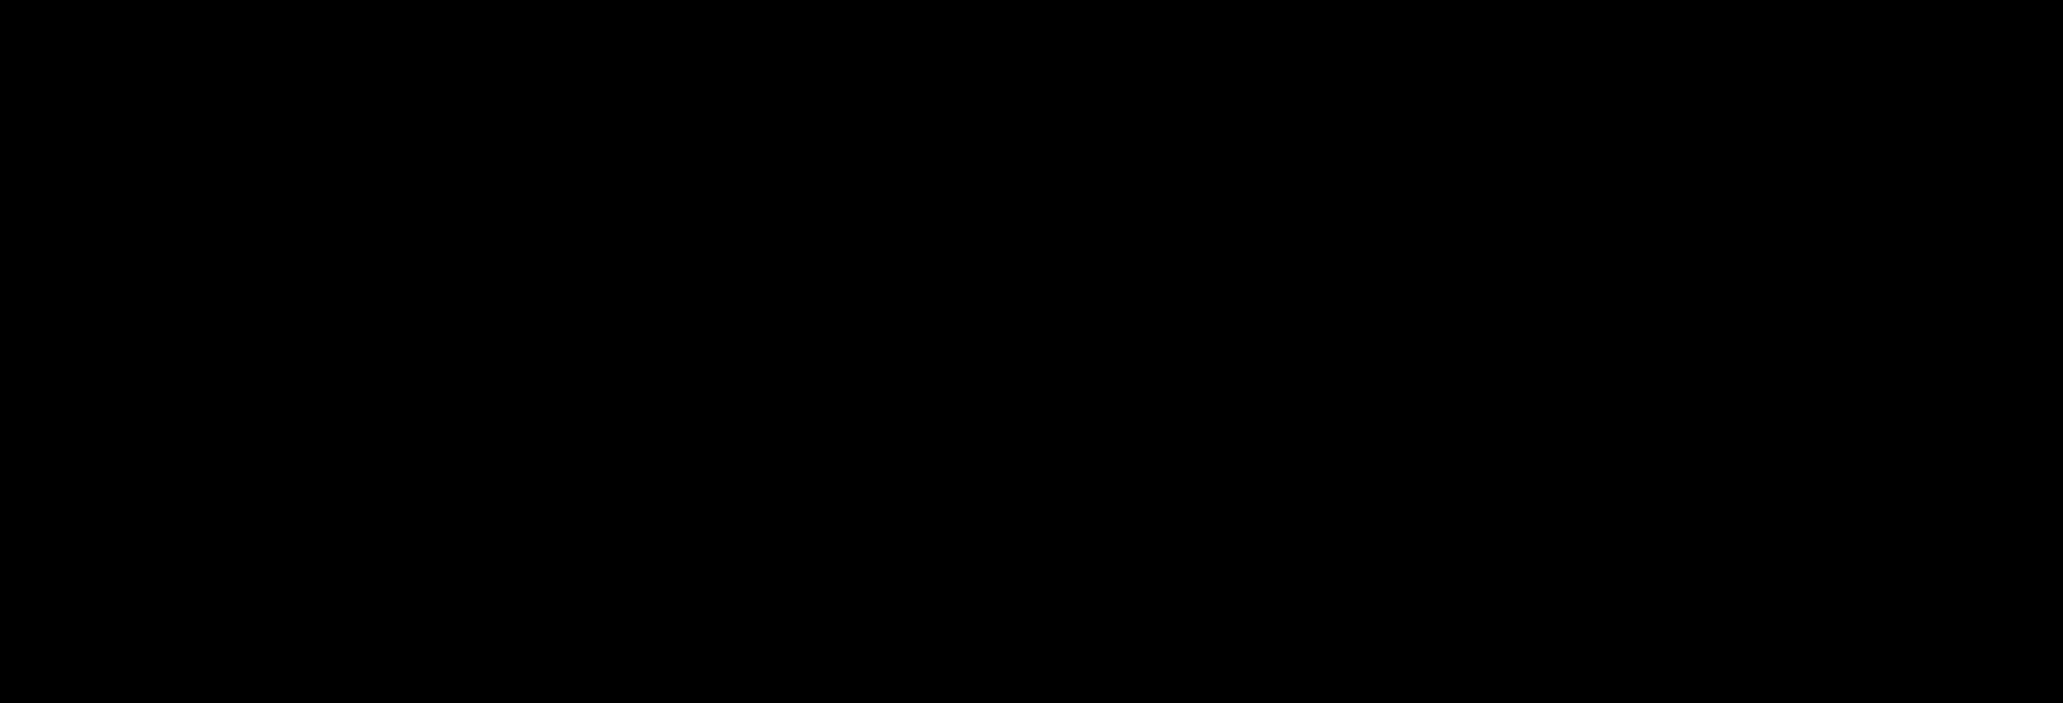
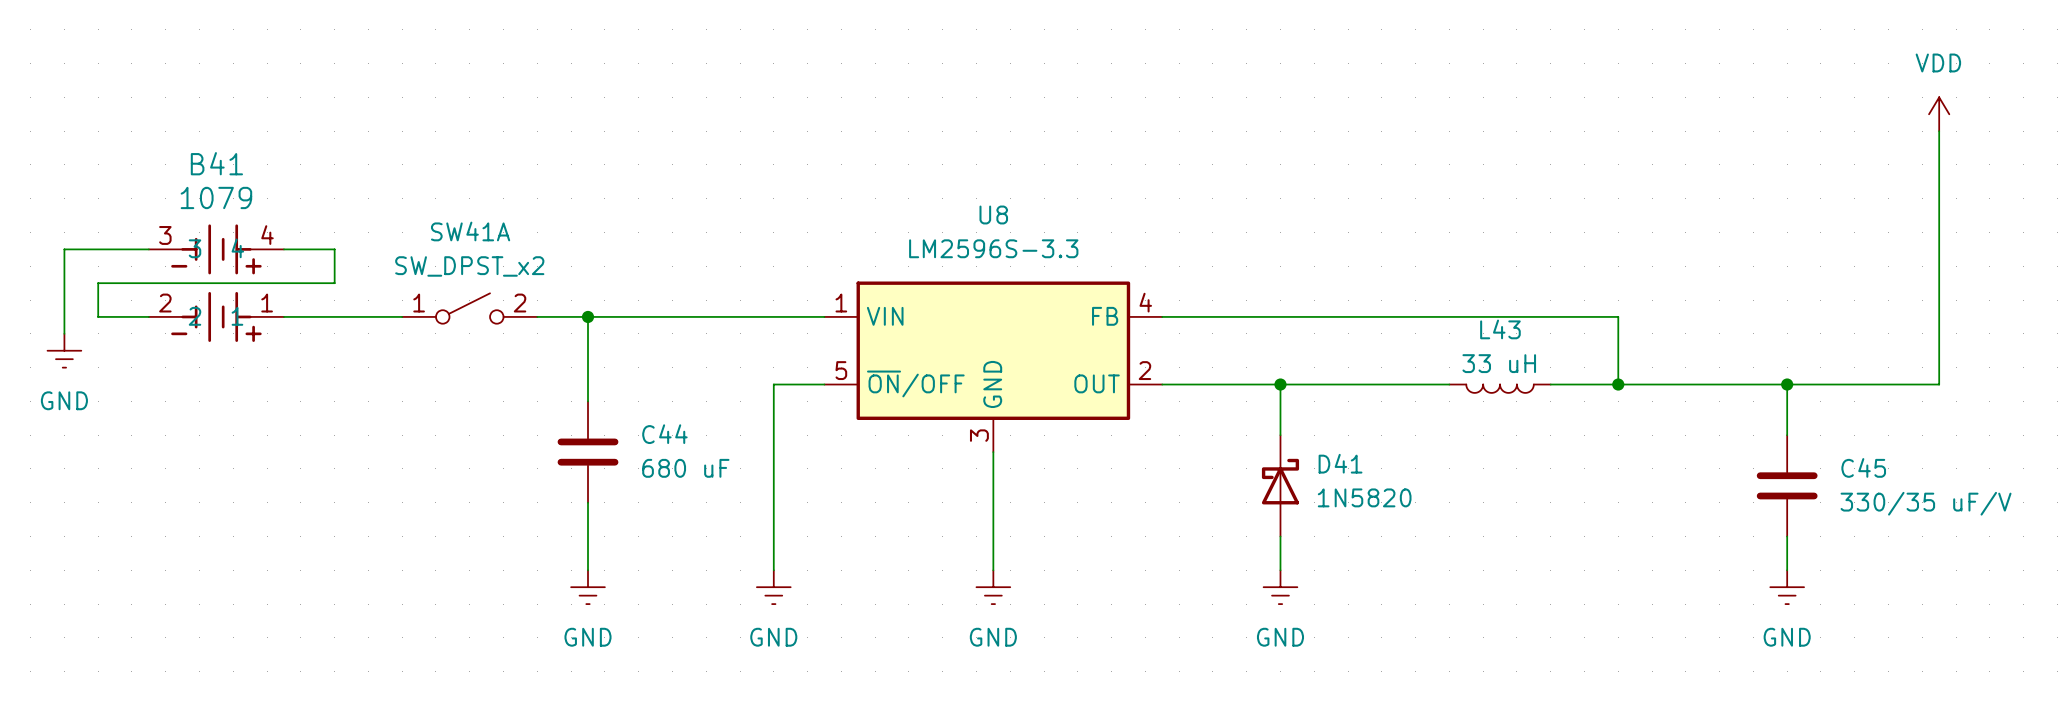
power symbol: none -> VDD (1939, 114)
wire: none -> (1939, 131) (1939, 384) (1550, 384)
wire: none -> (148, 249) (64, 249) (64, 333)
wire: none -> (283, 249) (334, 249) (334, 283) (98, 283) (98, 316) (148, 316)
B41: none -> 1079 (216, 283)
SW41A: none -> SW_DPST_x2 (469, 308)
wire: none -> (283, 316) (402, 316)
wire: none -> (537, 316) (824, 316)
wire: none -> (588, 316) (588, 401)
junction: none -> (588, 316)
wire: none -> (1162, 316) (1618, 316) (1618, 384)
power symbol: none -> GND (64, 350)
U8: none -> LM2596S-3.3 (993, 366)
wire: none -> (824, 384) (773, 384) (773, 570)
wire: none -> (1162, 384) (1449, 384)
wire: none -> (1280, 384) (1280, 435)
junction: none -> (1280, 384)
junction: none -> (1618, 384)
wire: none -> (1787, 384) (1787, 435)
junction: none -> (1787, 384)
L43: none -> 33 uH (1500, 388)
C44: none -> 680 uF (588, 452)
wire: none -> (993, 452) (993, 570)
D41: none -> 1N5820 (1280, 485)
C45: none -> 330/35 uF/V (1787, 485)
wire: none -> (588, 502) (588, 570)
wire: none -> (1280, 536) (1280, 570)
wire: none -> (1787, 536) (1787, 570)
power symbol: none -> GND (588, 587)
power symbol: none -> GND (773, 587)
power symbol: none -> GND (993, 587)
power symbol: none -> GND (1280, 587)
power symbol: none -> GND (1787, 587)

